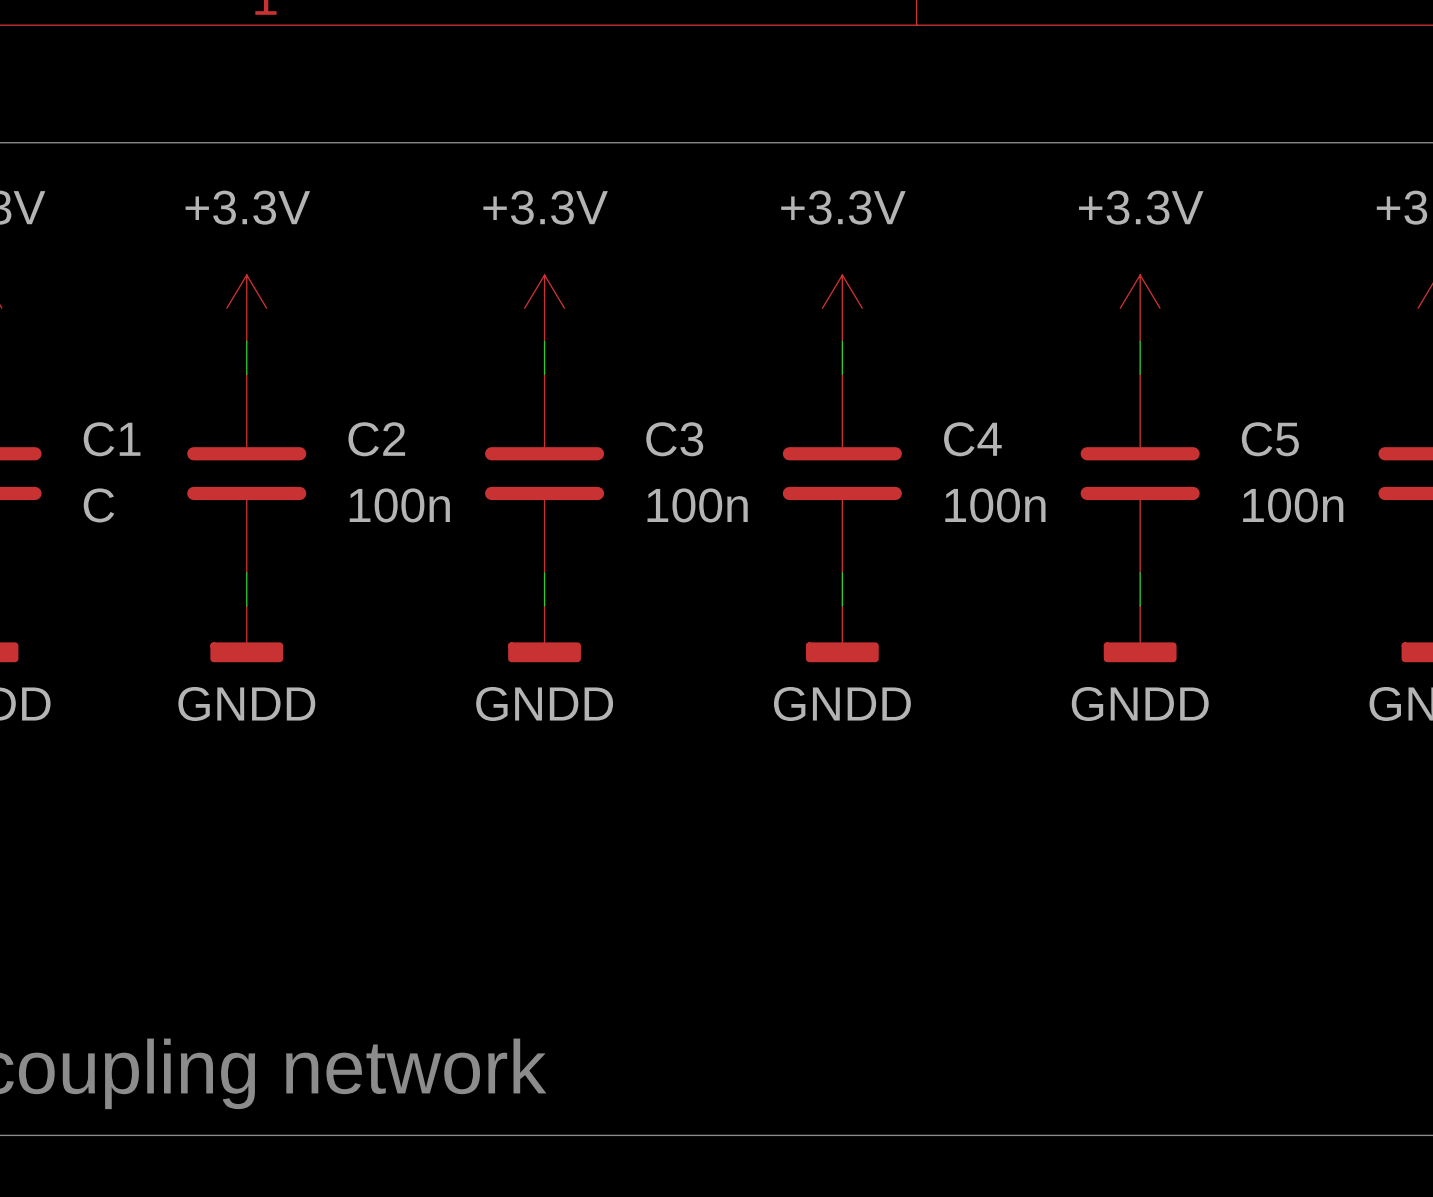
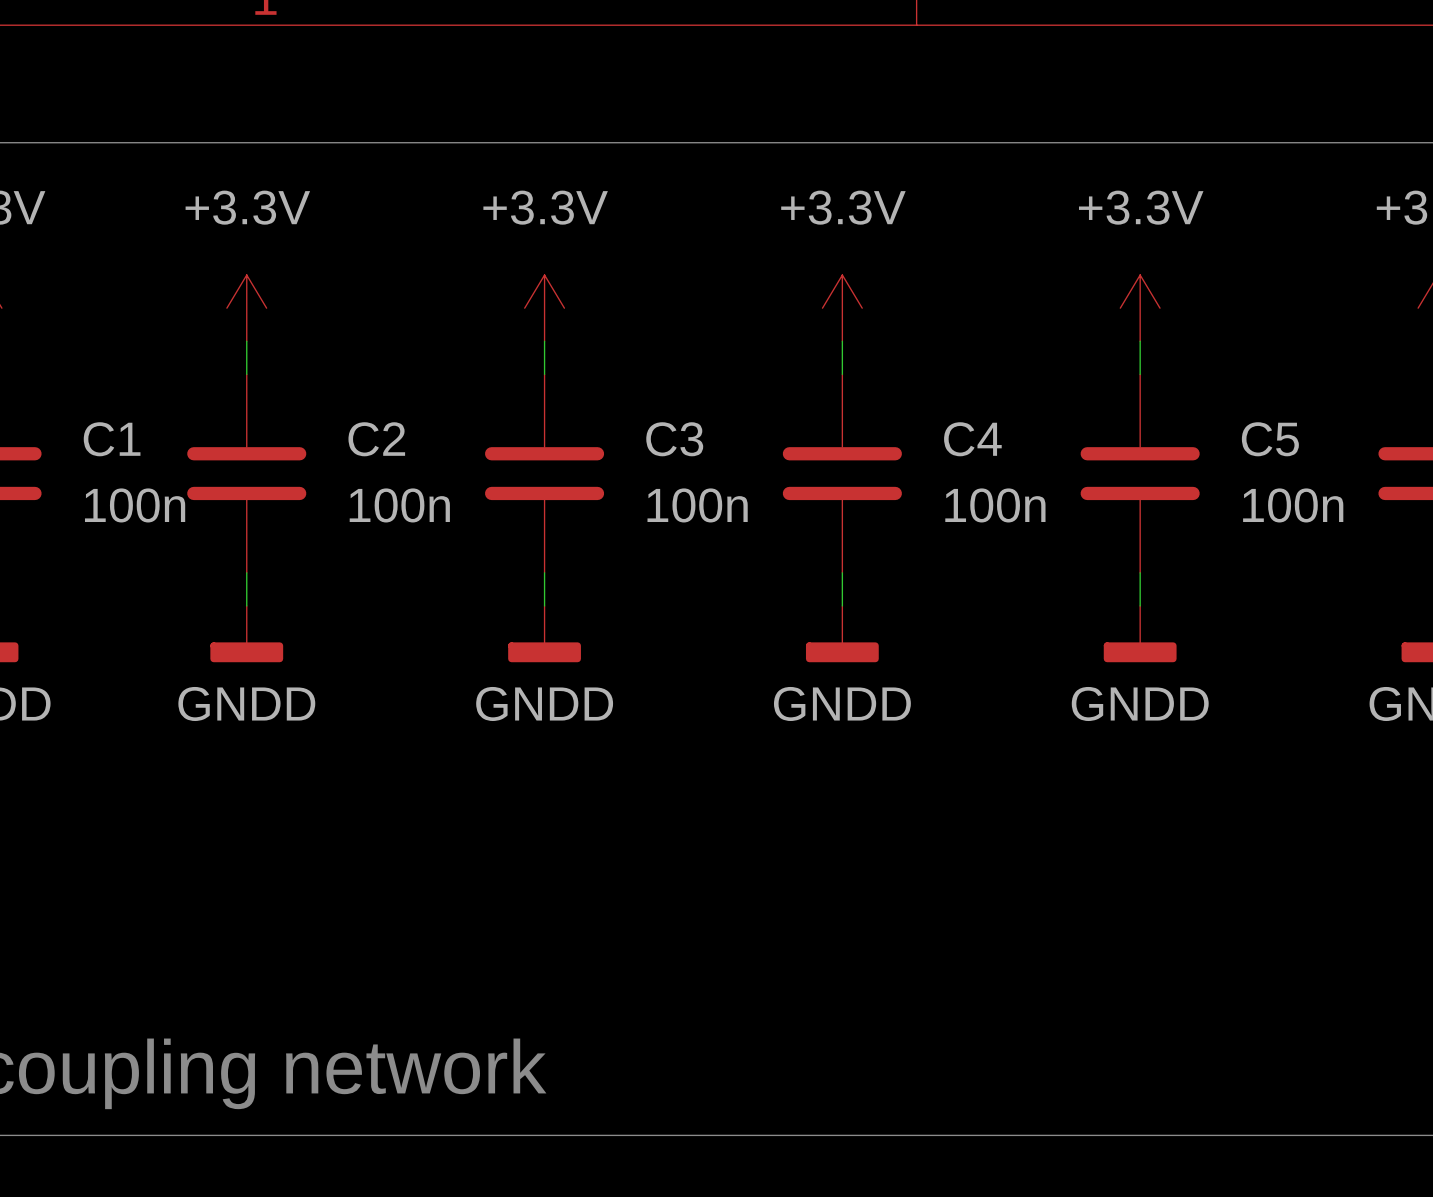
C1 value: C (98, 505) -> 100n (135, 505)

